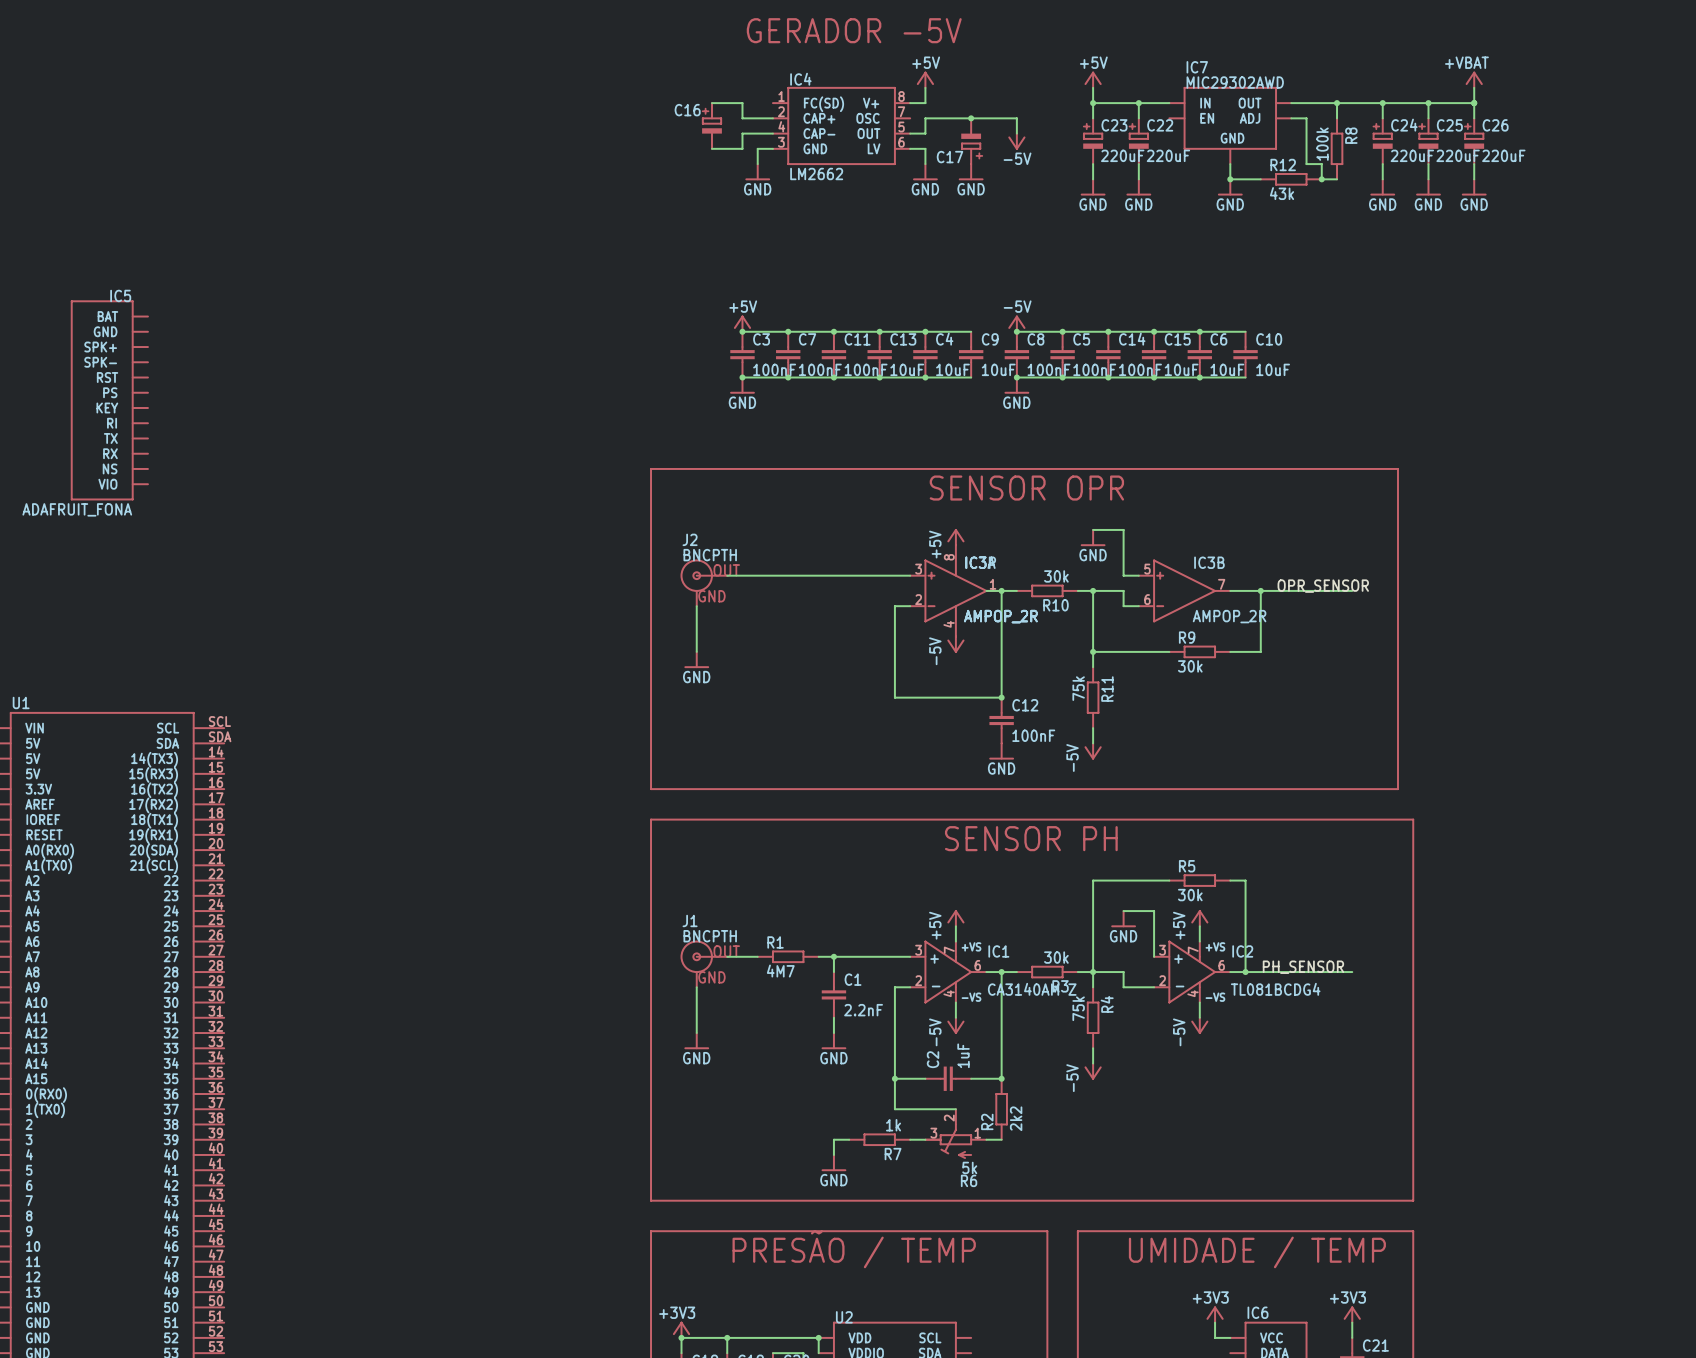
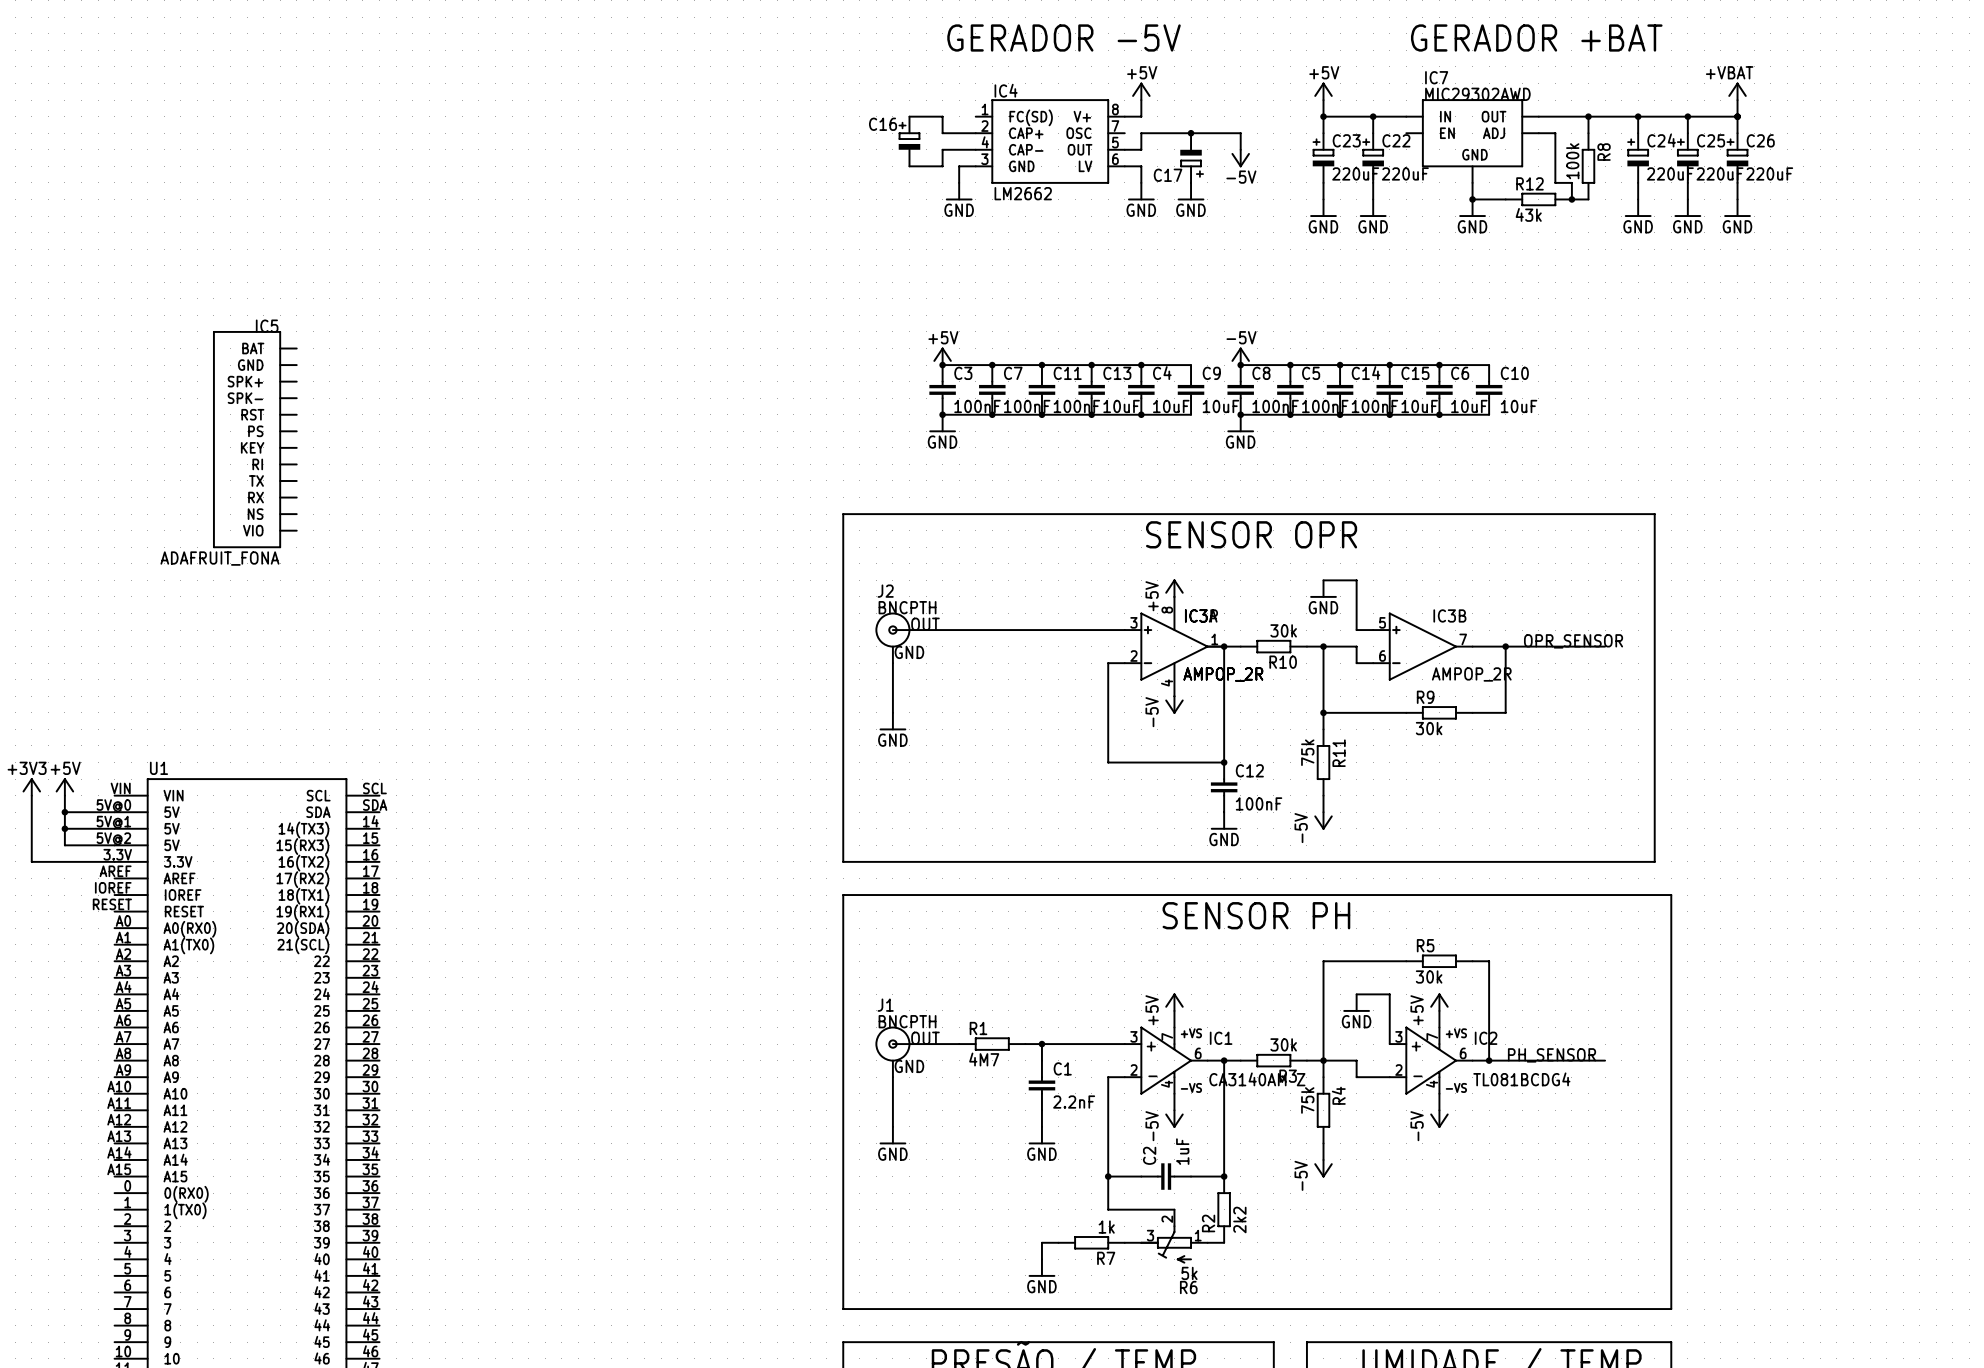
text: none -> GERADOR +BAT (1536, 37)

